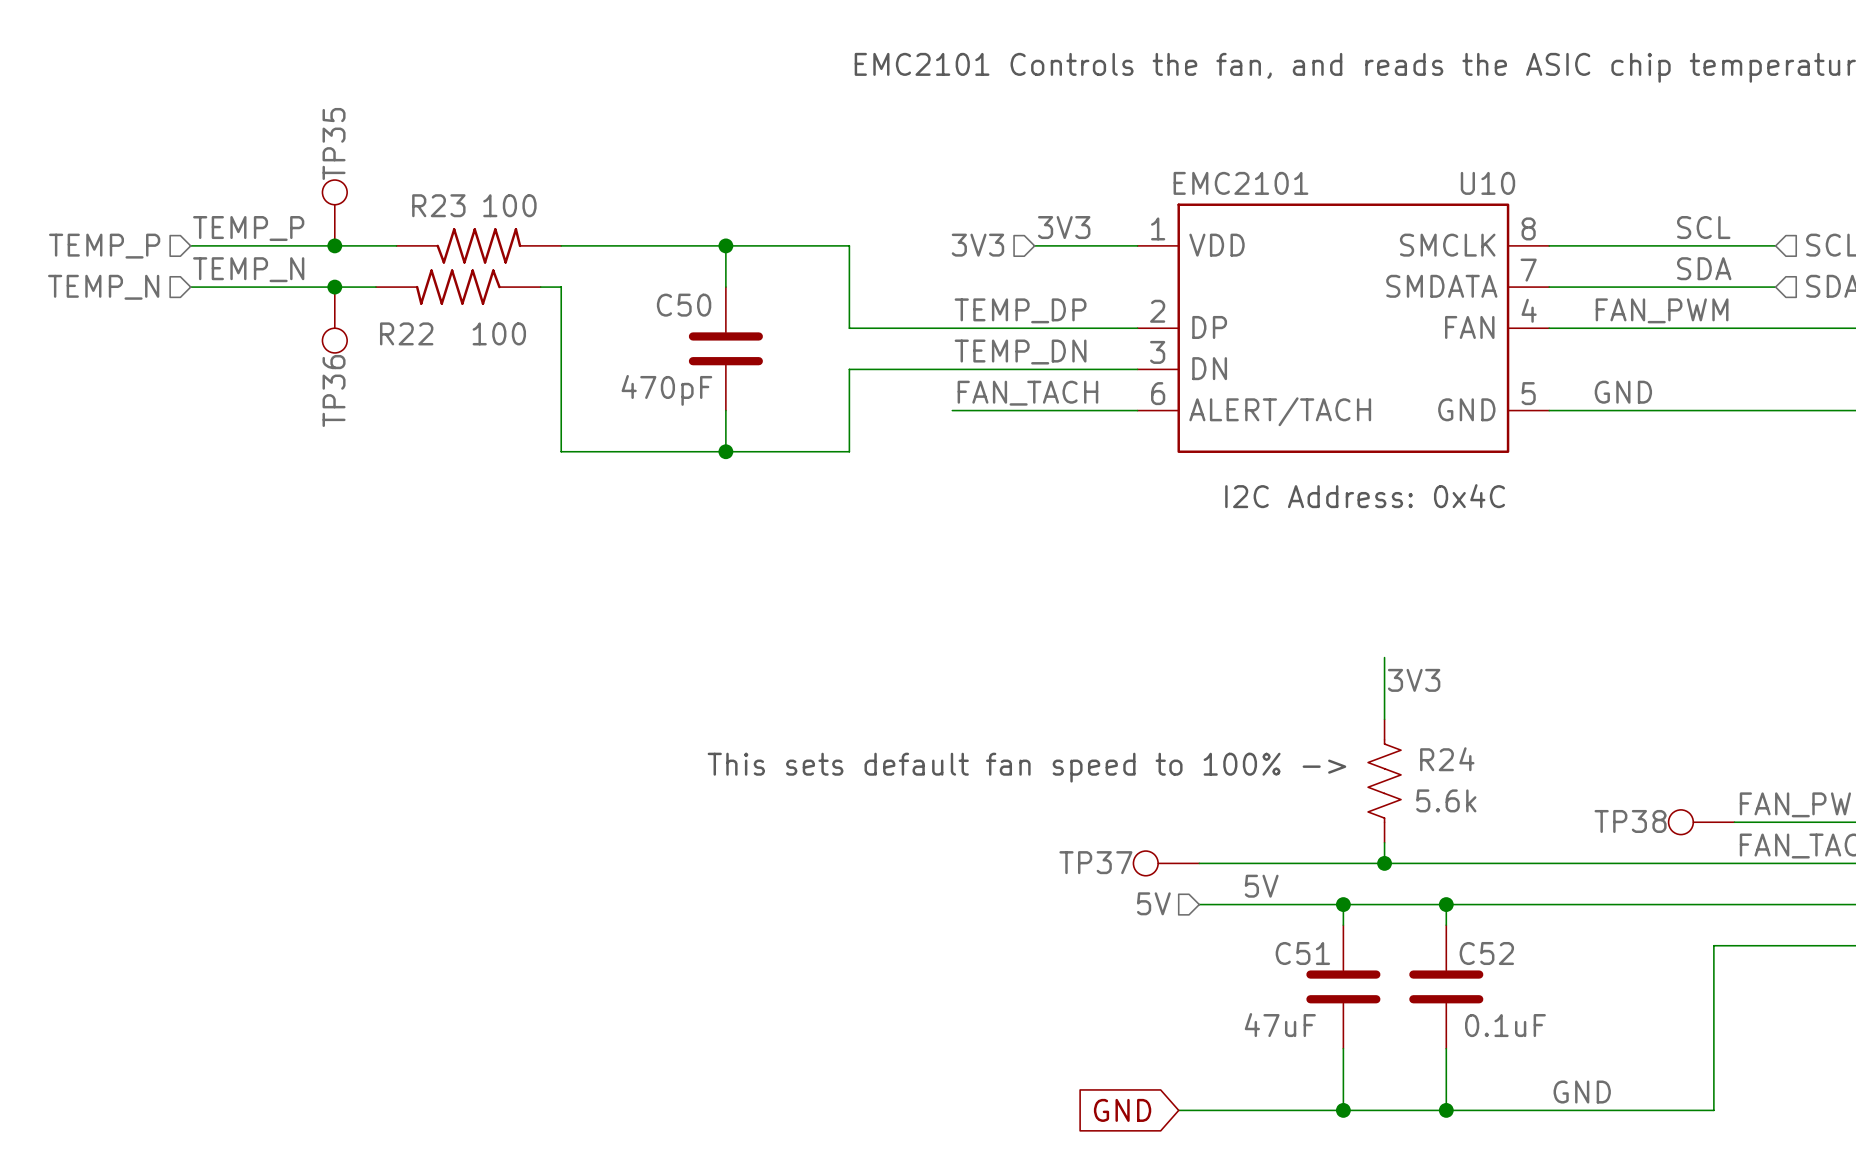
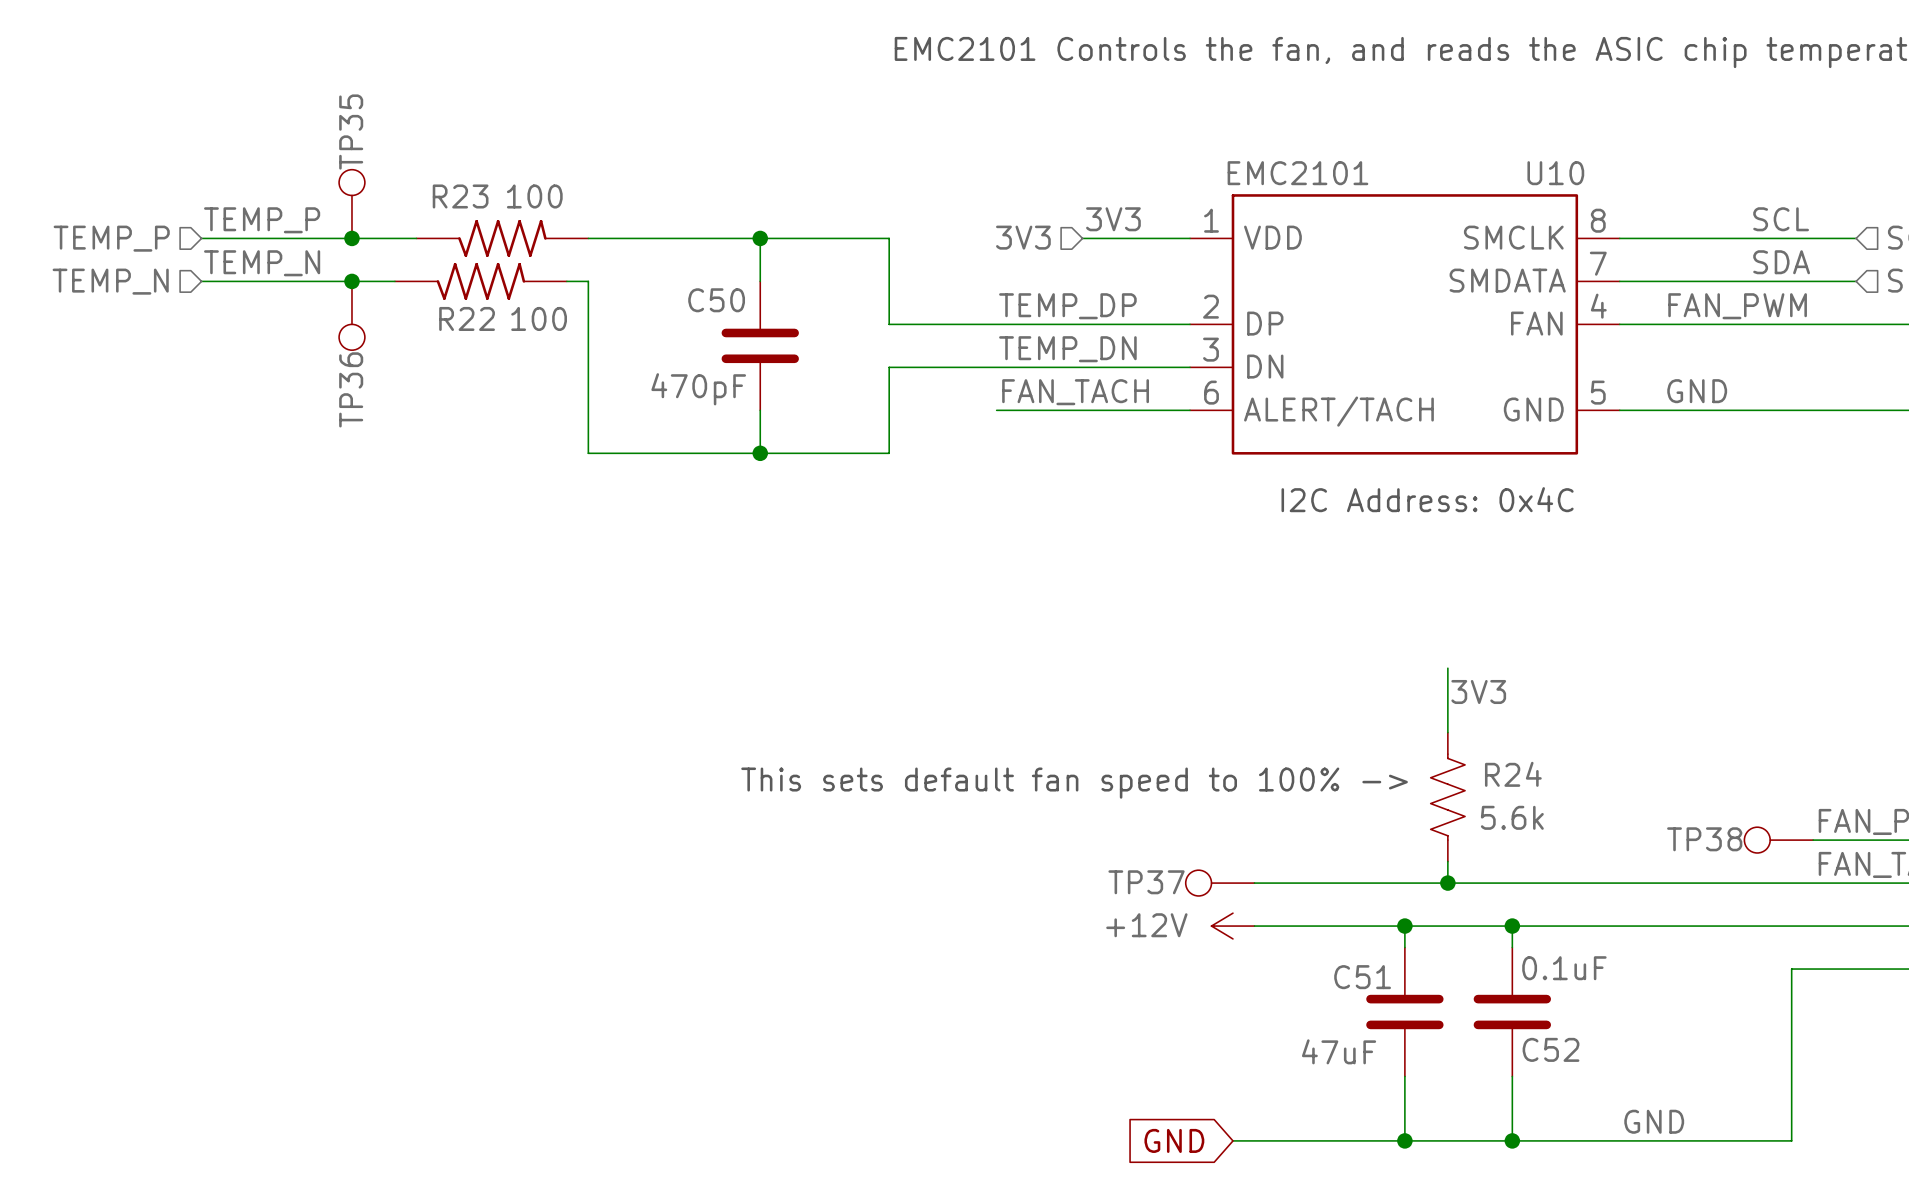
R22 rotation: 0° (458, 287) -> 180° (480, 281)
R22 name position: R22 (406, 333) -> R22 (467, 318)
label: 5V (1261, 886) -> none
hierarchical label: 5V (1153, 903) -> none
power symbol: none -> +12V (1232, 926)
C52 name position: C52 (1486, 953) -> C52 (1551, 1049)
C52 value position: 0.1uF (1505, 1025) -> 0.1uF (1564, 968)

